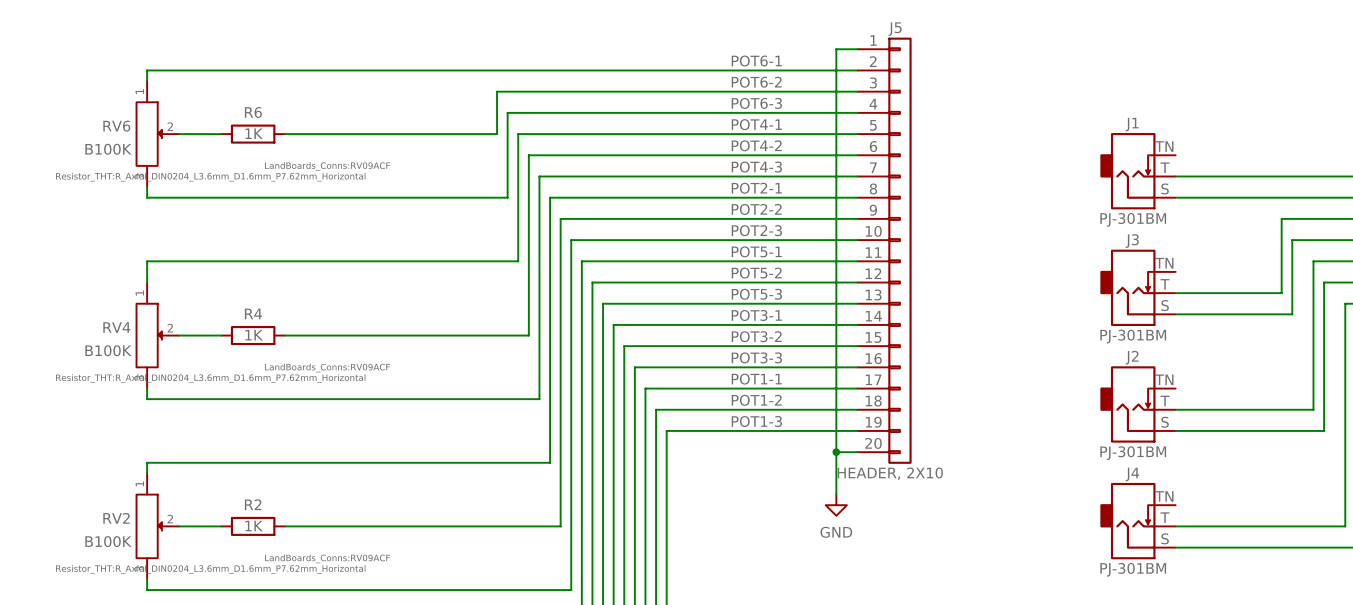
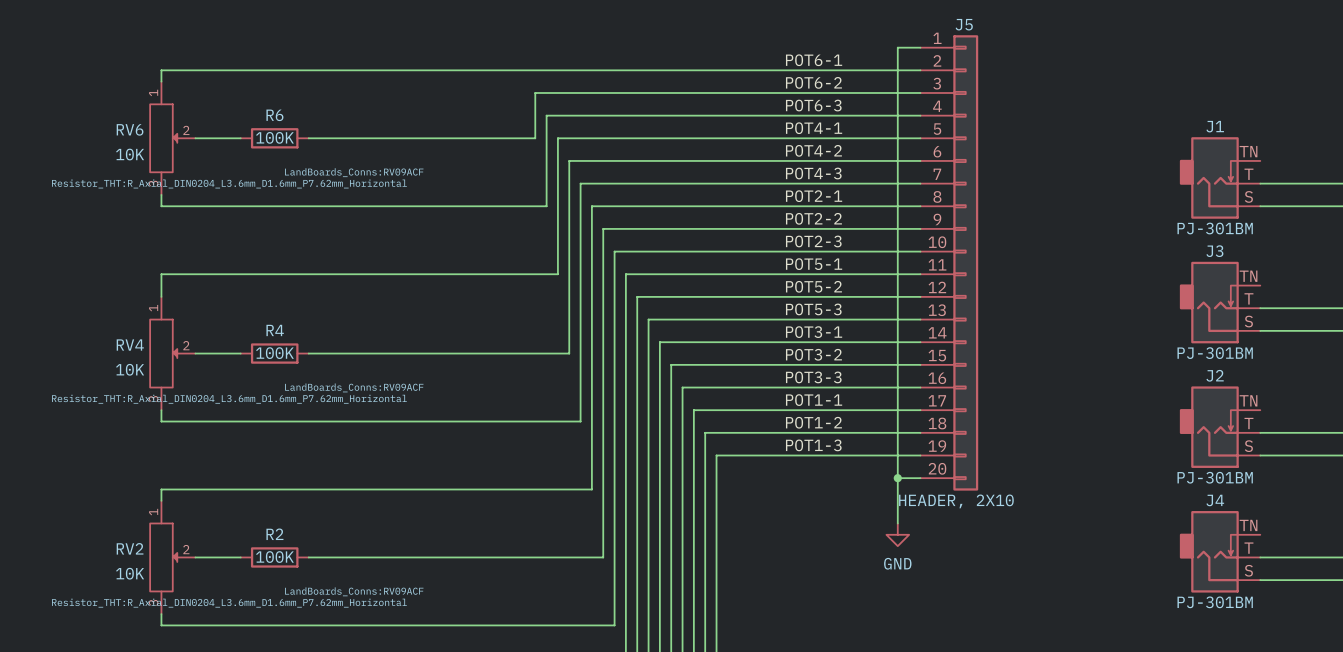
R6 value: 1K (254, 133) -> 100K (274, 137)
RV6 value: B100K (108, 149) -> 10K (130, 154)
R4 value: 1K (254, 335) -> 100K (274, 353)
RV4 value: B100K (108, 350) -> 10K (130, 369)
R2 value: 1K (254, 526) -> 100K (274, 557)
RV2 value: B100K (108, 541) -> 10K (130, 573)

